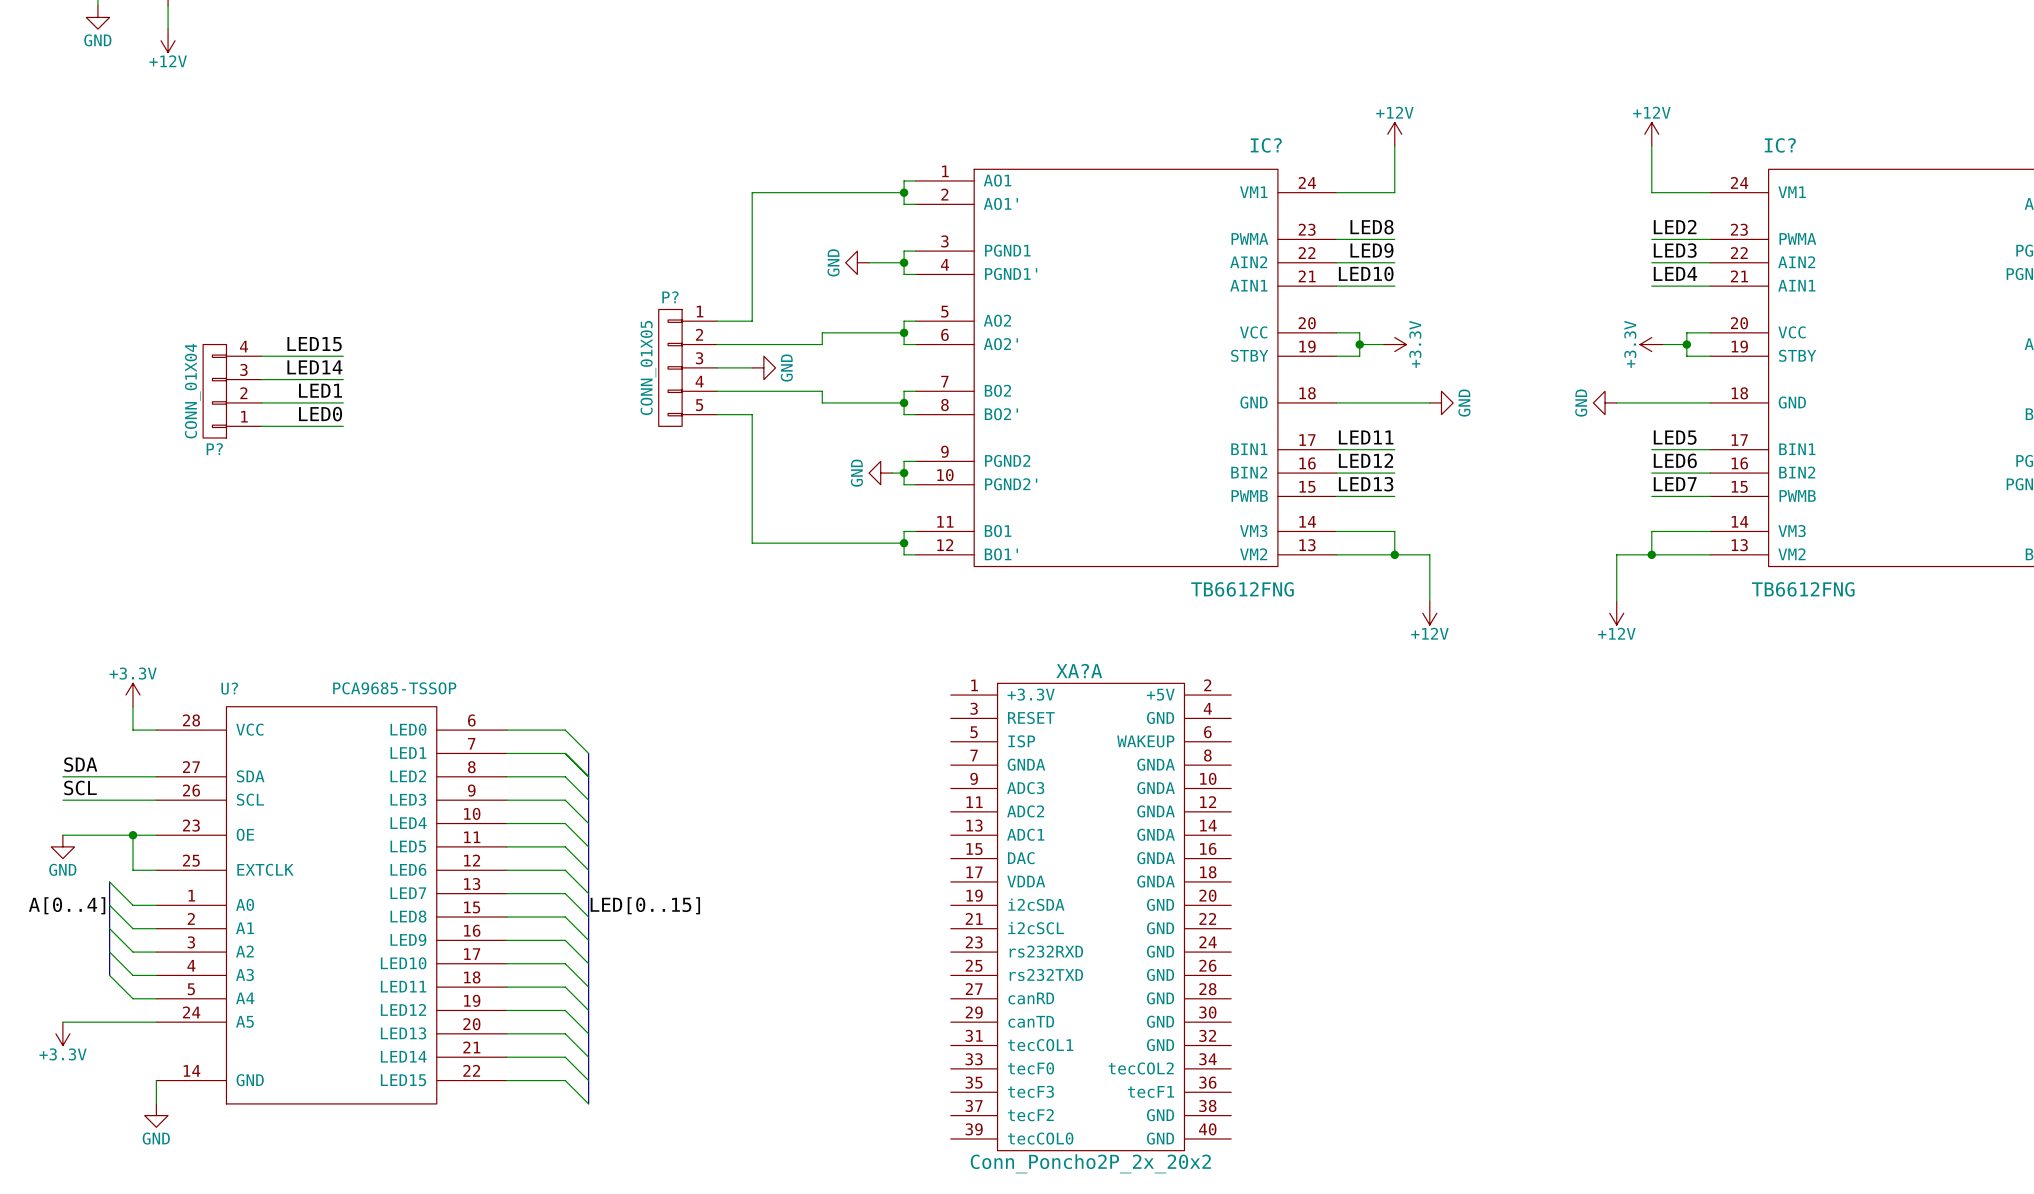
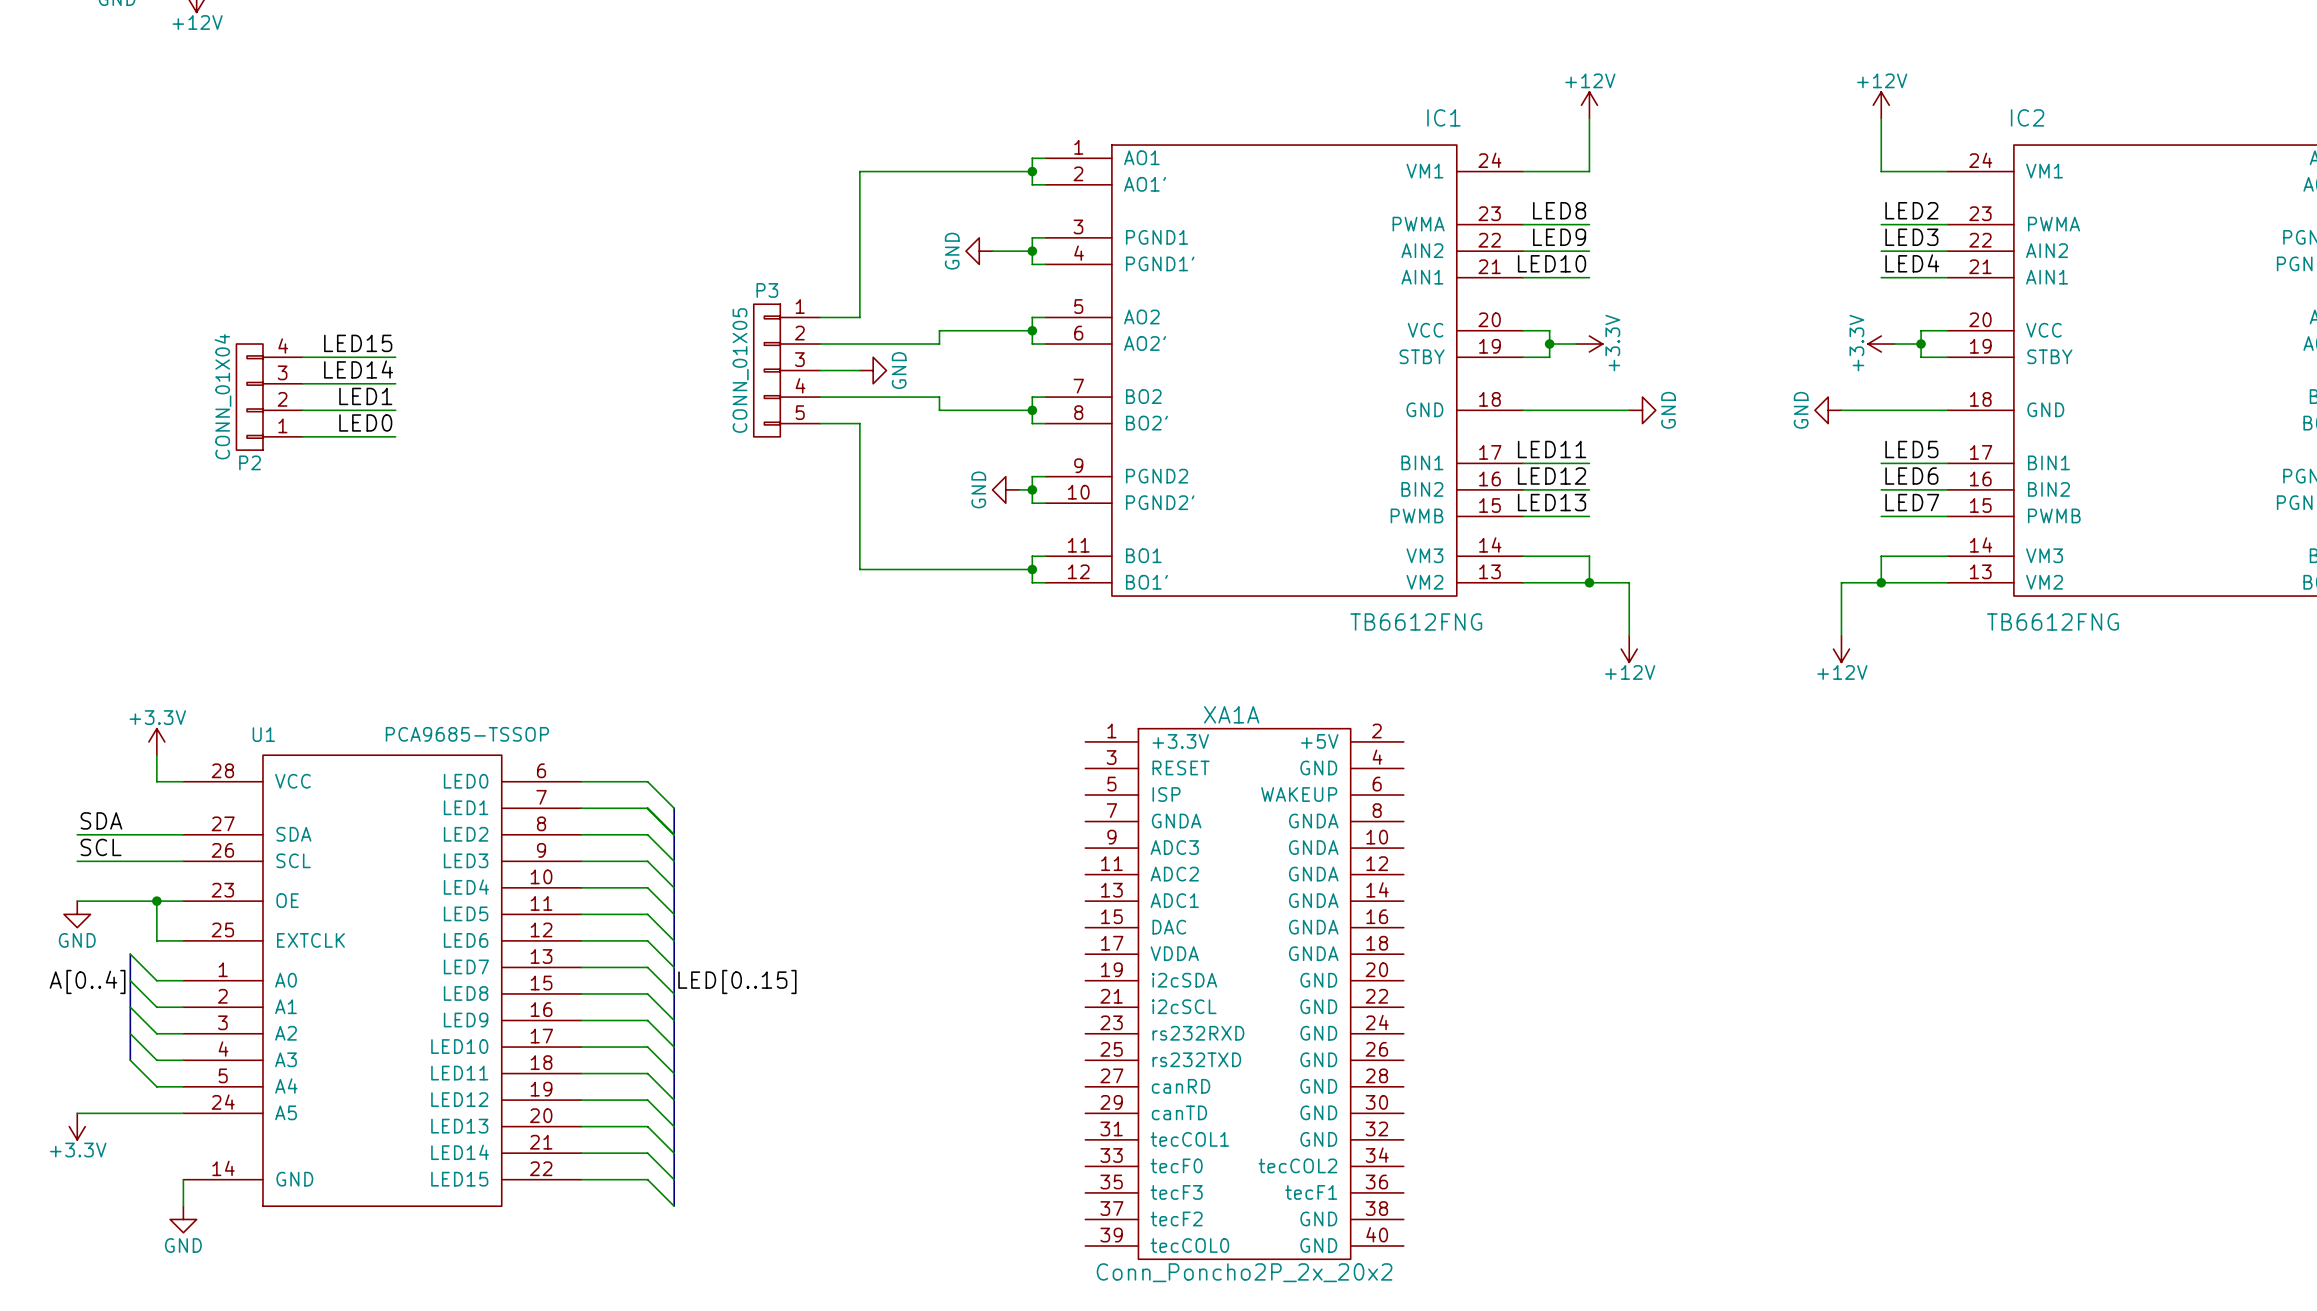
IC? name: IC? (1266, 145) -> IC1 (1443, 117)
IC? name: IC? (1780, 145) -> IC2 (2027, 117)
P? name: P? (670, 297) -> P3 (767, 290)
P? name: P? (214, 449) -> P2 (250, 462)
XA?A name: XA?A (1079, 671) -> XA1A (1231, 714)
U? name: U? (229, 688) -> U1 (263, 734)

